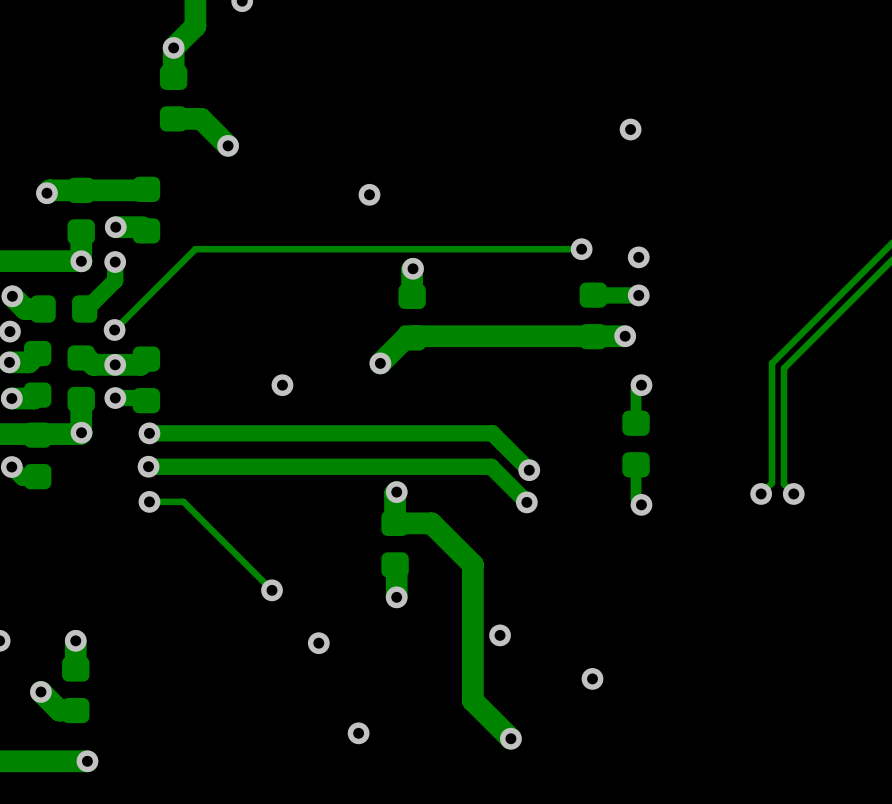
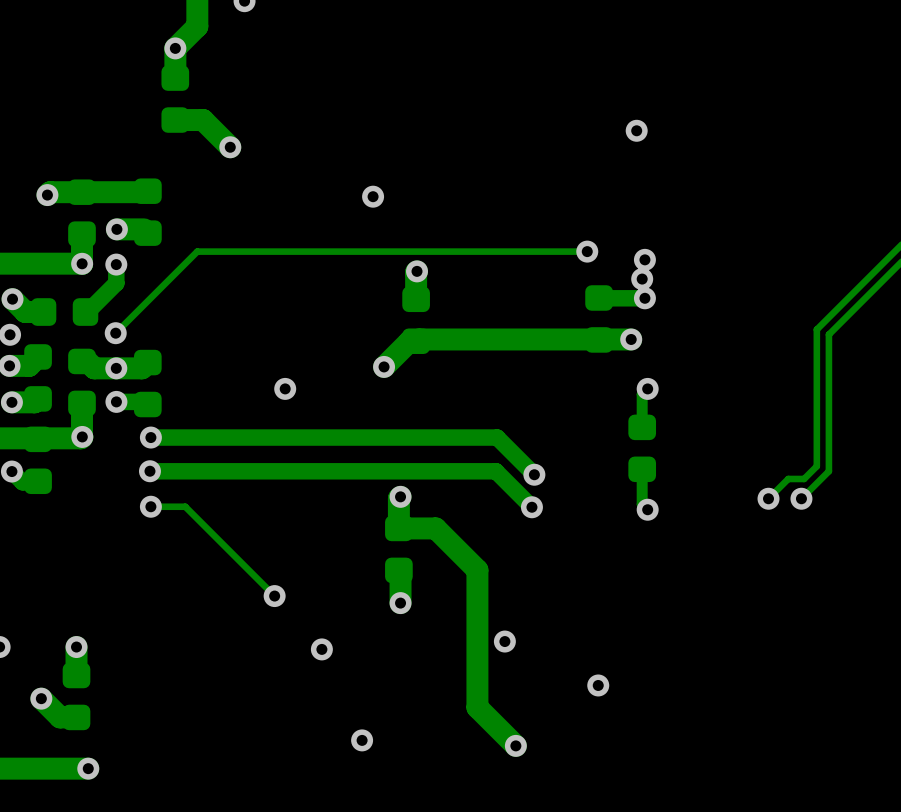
via: none -> (642, 279)
track: (809, 326) (772, 363) (772, 483) -> (816, 329) (816, 466) (804, 478) (788, 478) (779, 487)
track: (820, 331) (783, 368) (783, 484) (793, 493) -> (828, 334) (828, 471) (801, 498)

